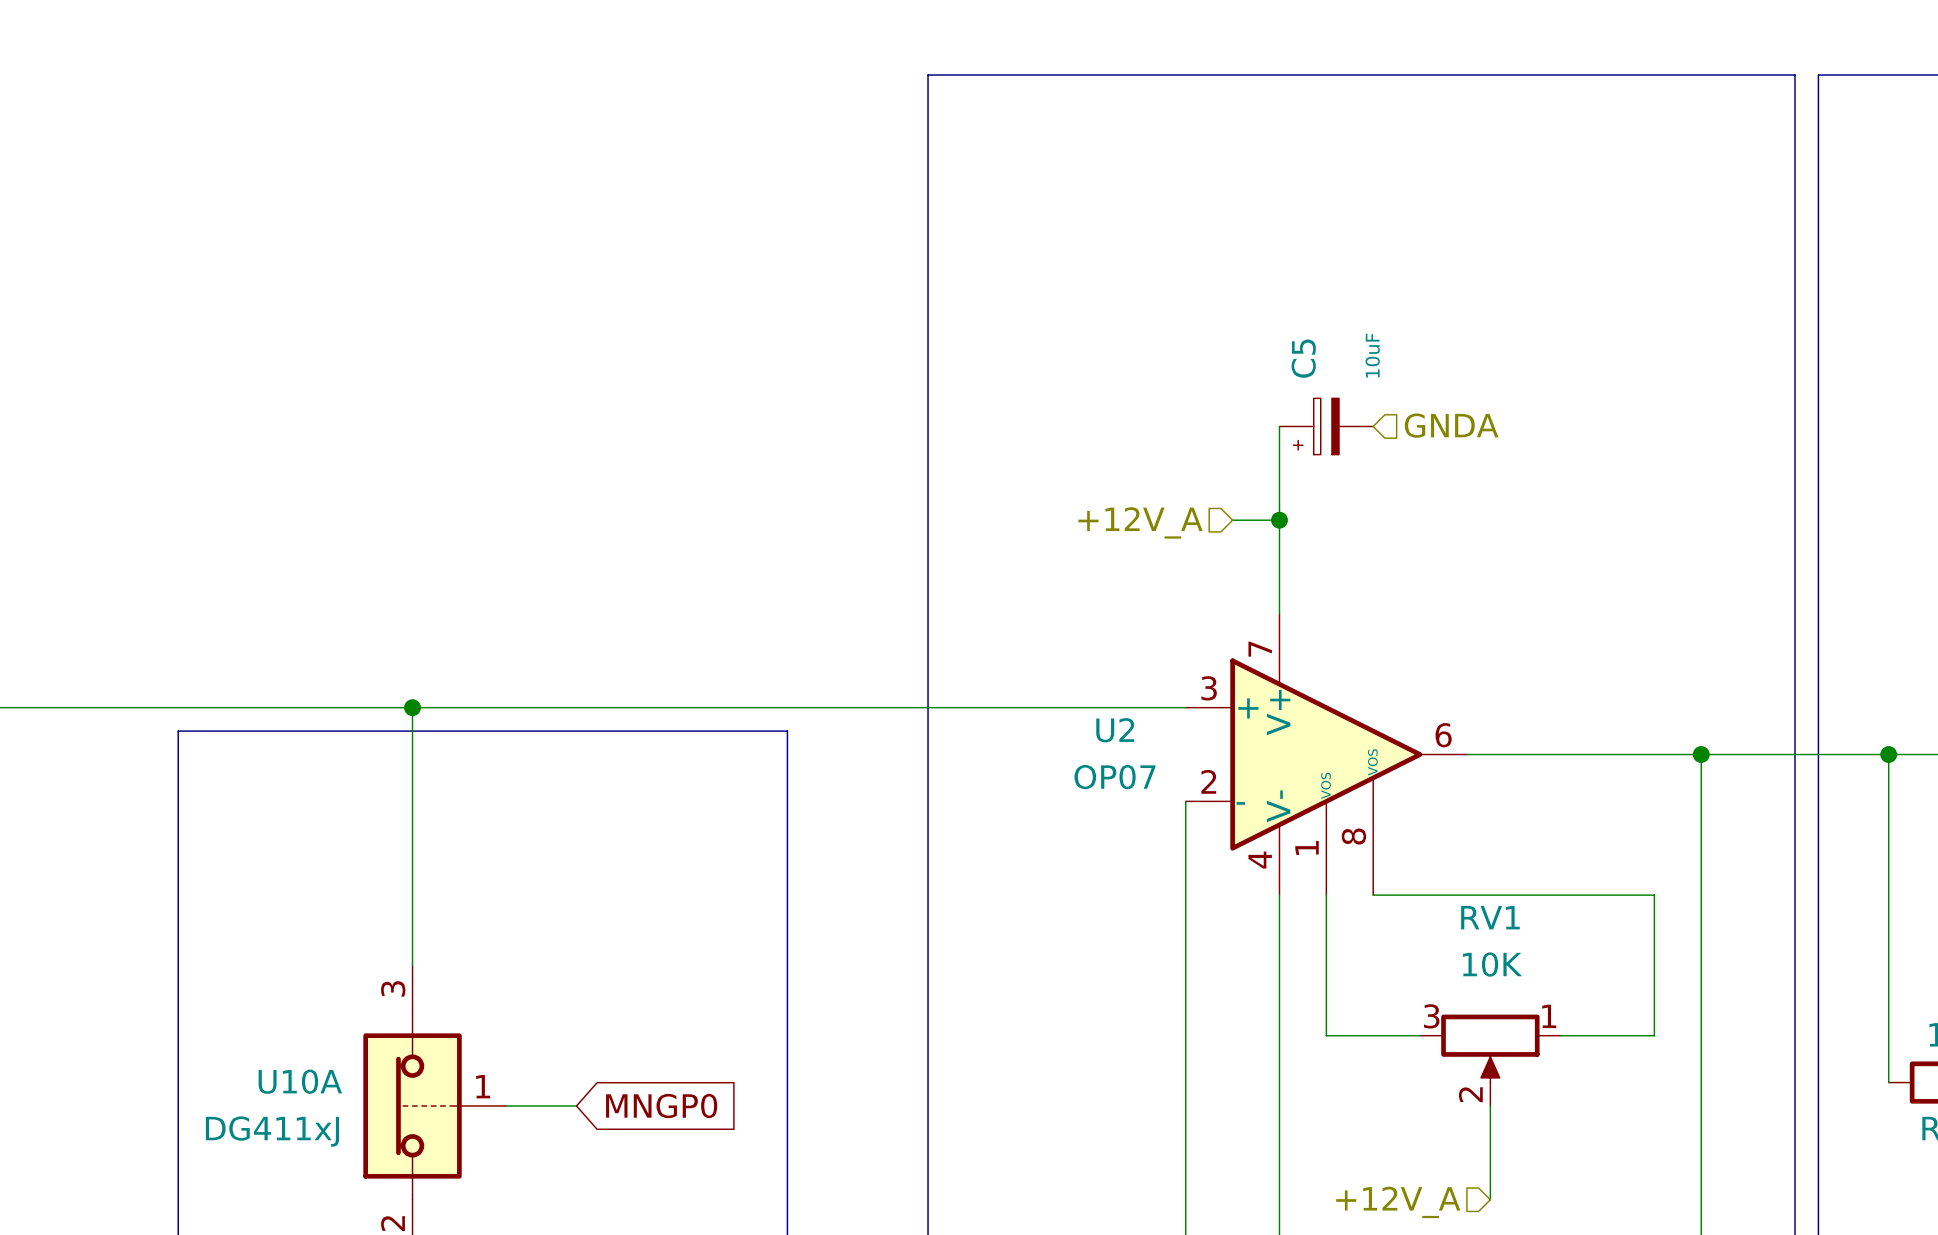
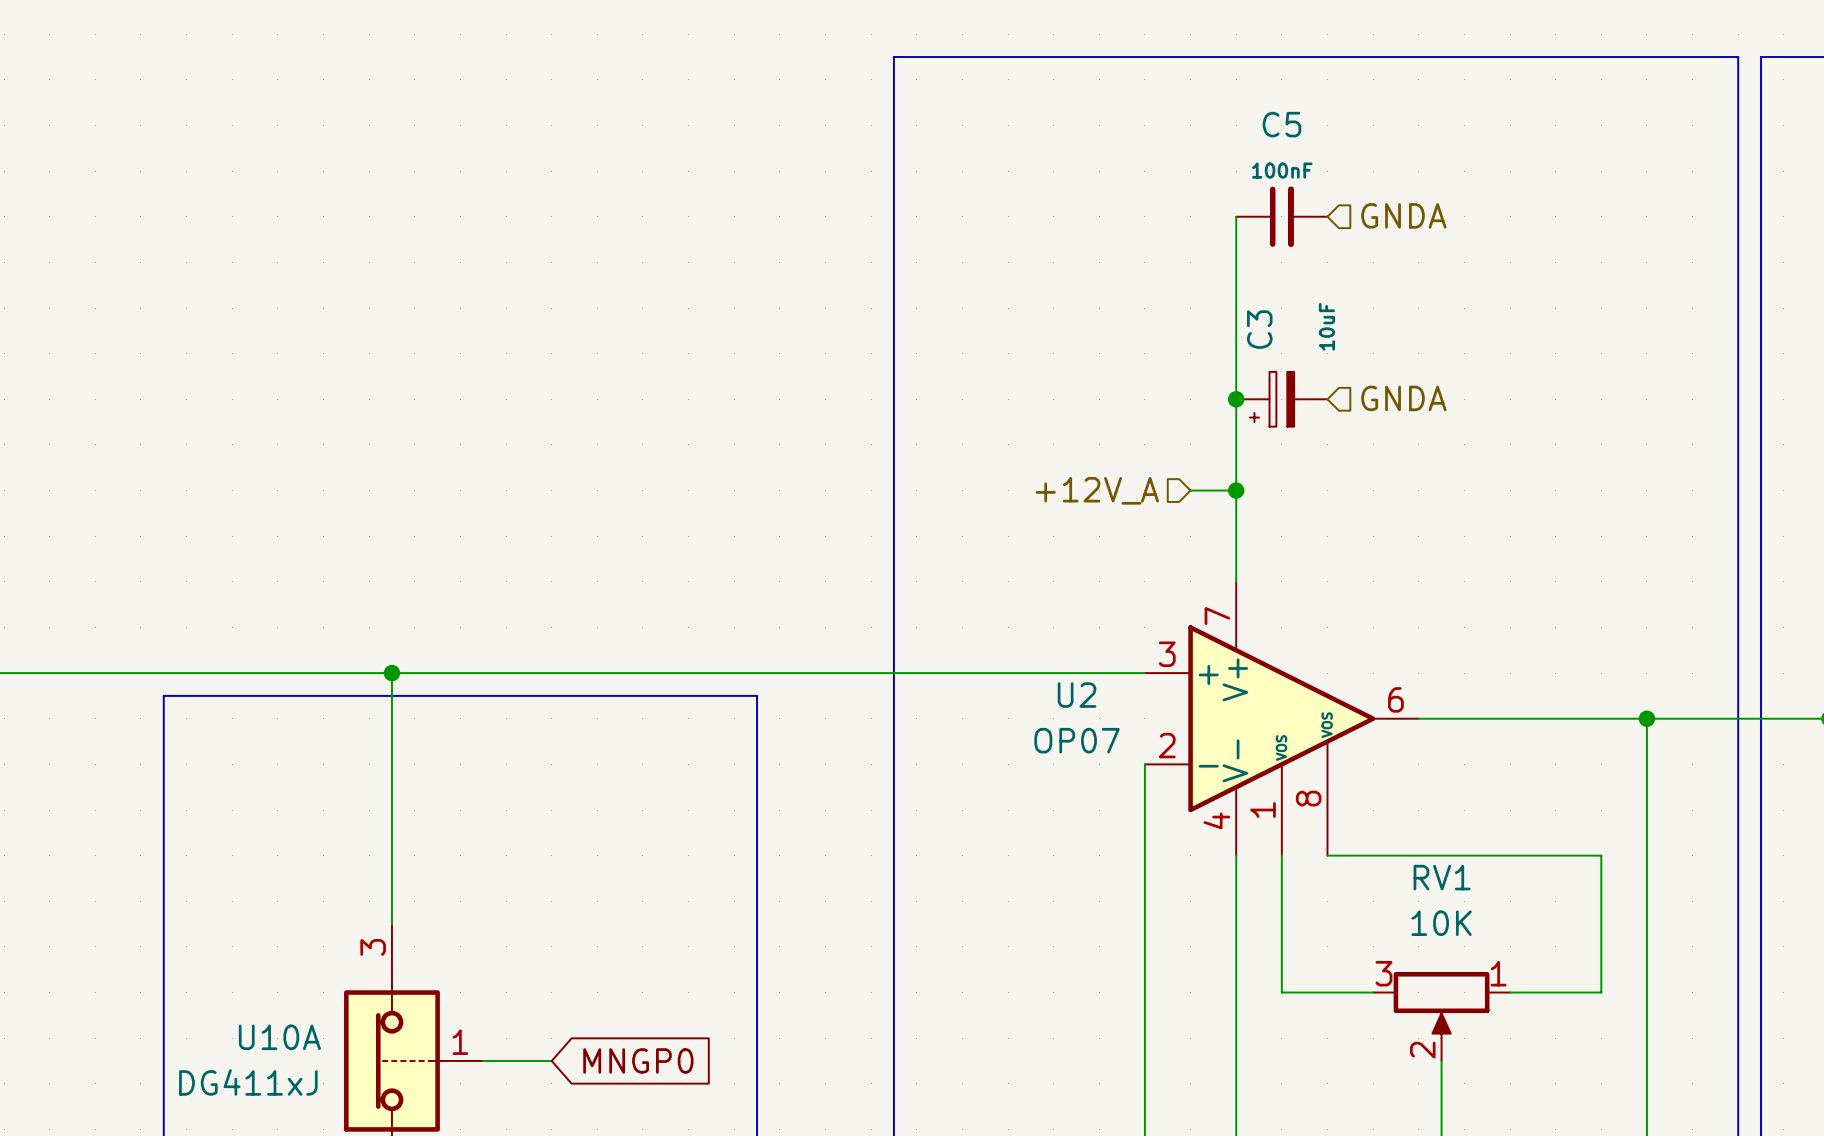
hierarchical label: none -> GNDA (1403, 215)
wire: none -> (1236, 216) (1236, 399)
C5: none -> 100nF (1281, 216)
C5 name: C5 (1303, 358) -> C3 (1259, 329)
junction: none -> (1236, 399)

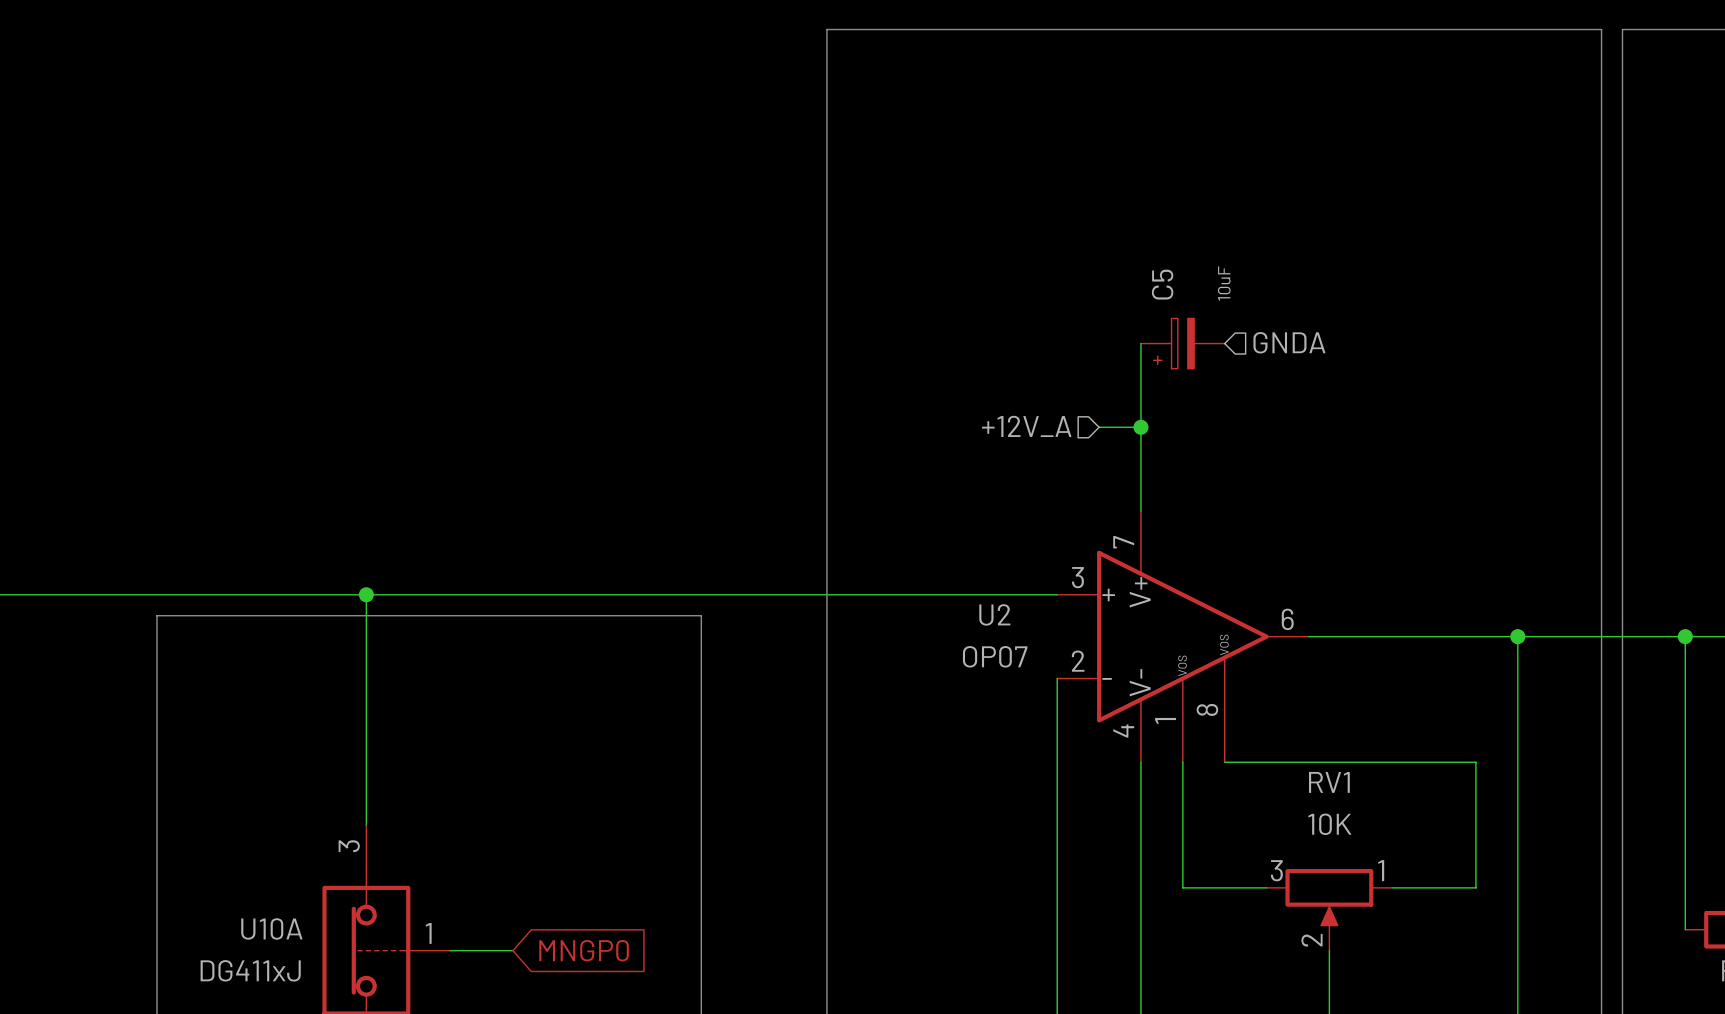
hierarchical label: GNDA (1403, 215) -> none
wire: (1236, 216) (1236, 399) -> none
C5: 100nF (1281, 216) -> none
C3 name: C3 (1259, 329) -> C5 (1162, 284)
junction: (1236, 399) -> none

